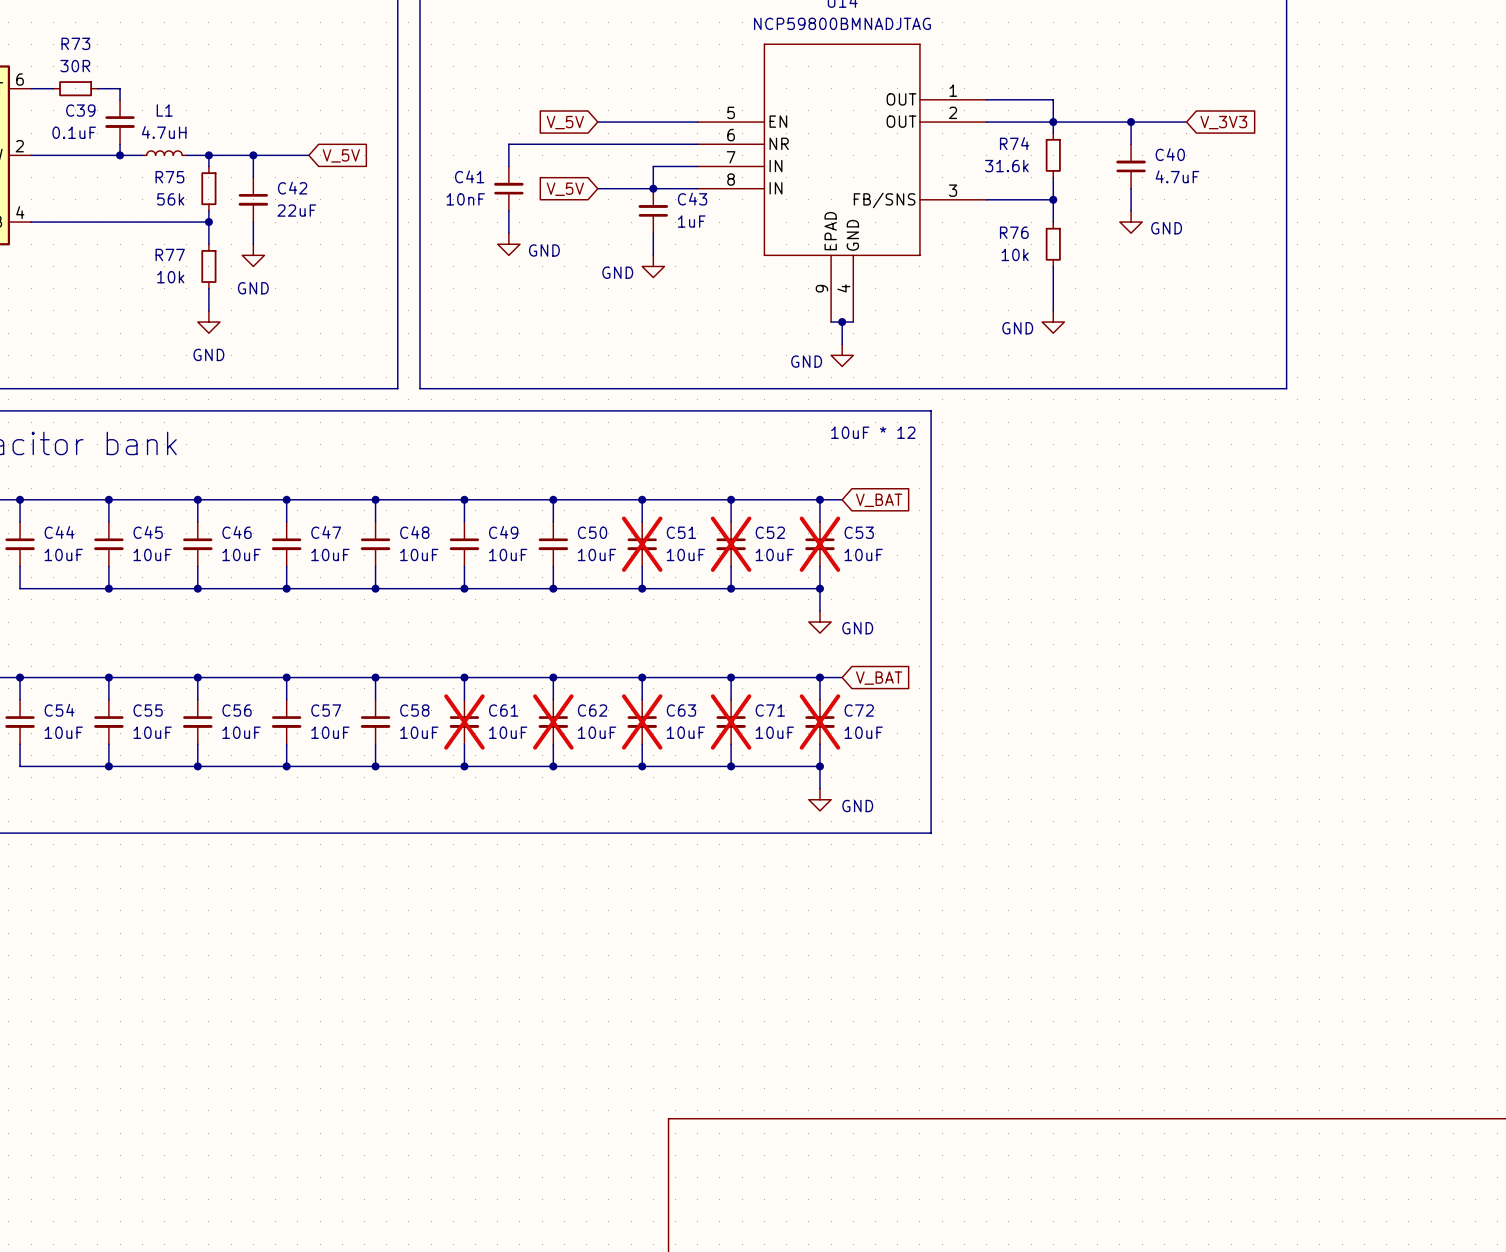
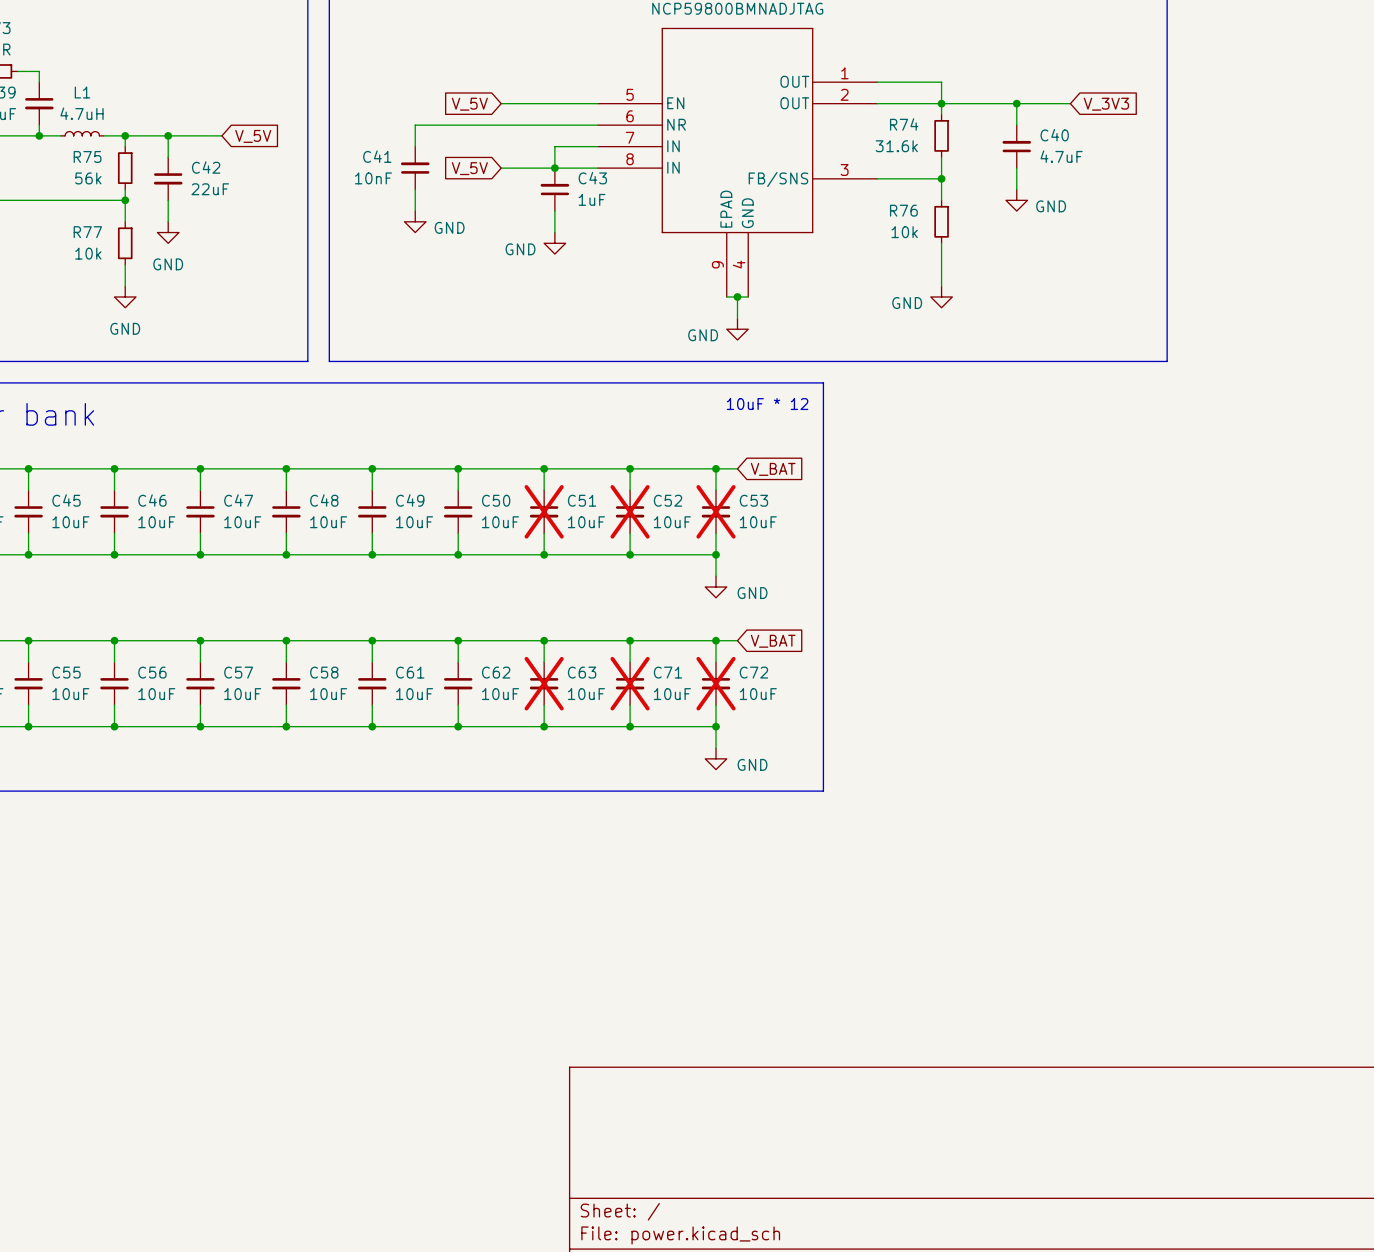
C61 do-not-place cross: (464, 721) -> none
C62 do-not-place cross: (553, 721) -> none

